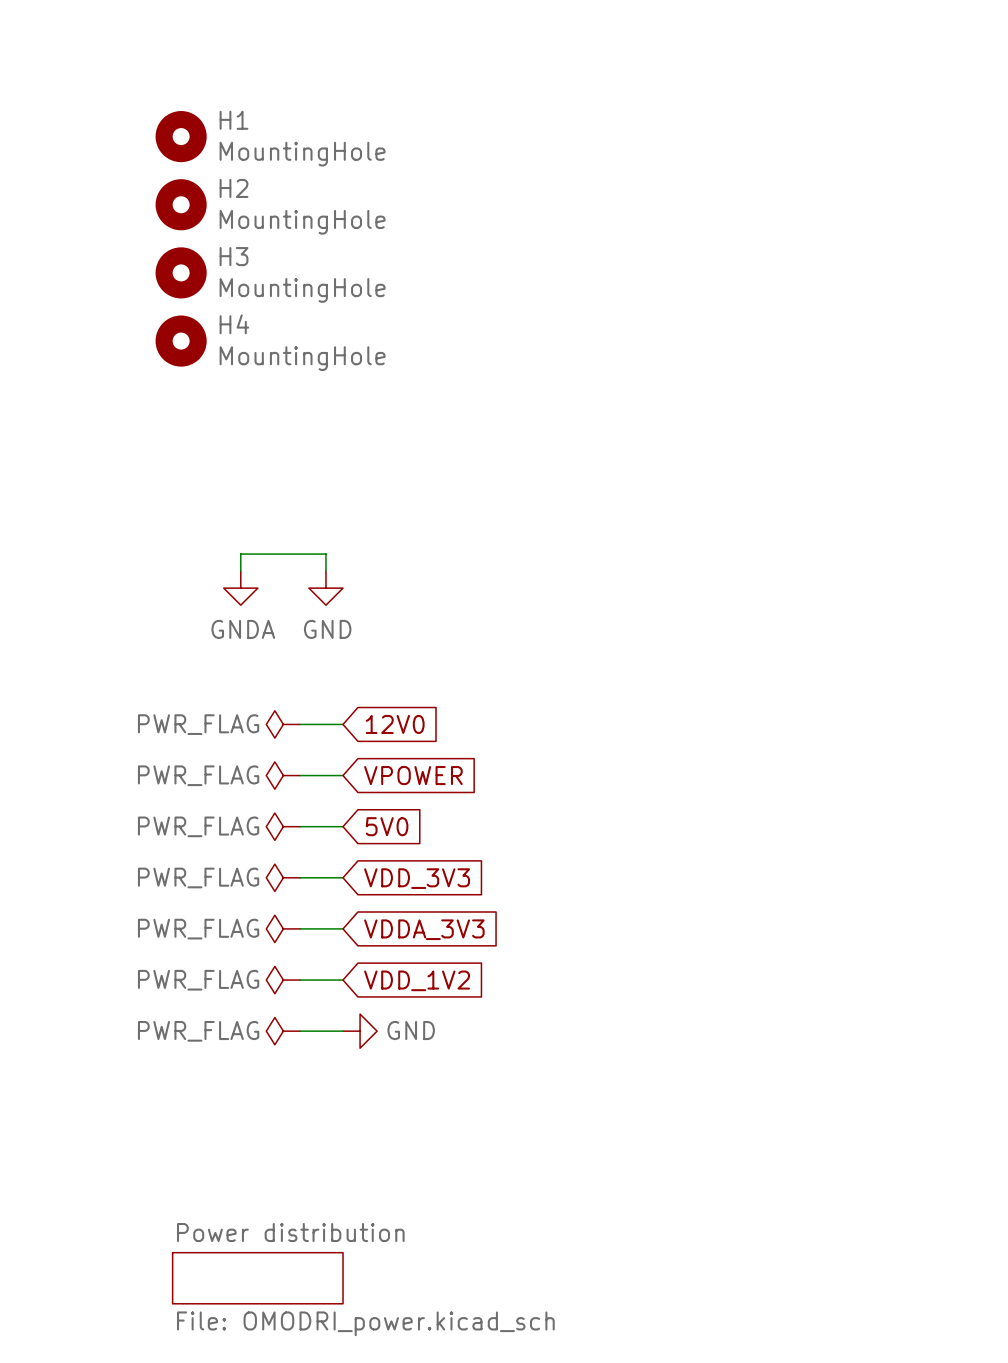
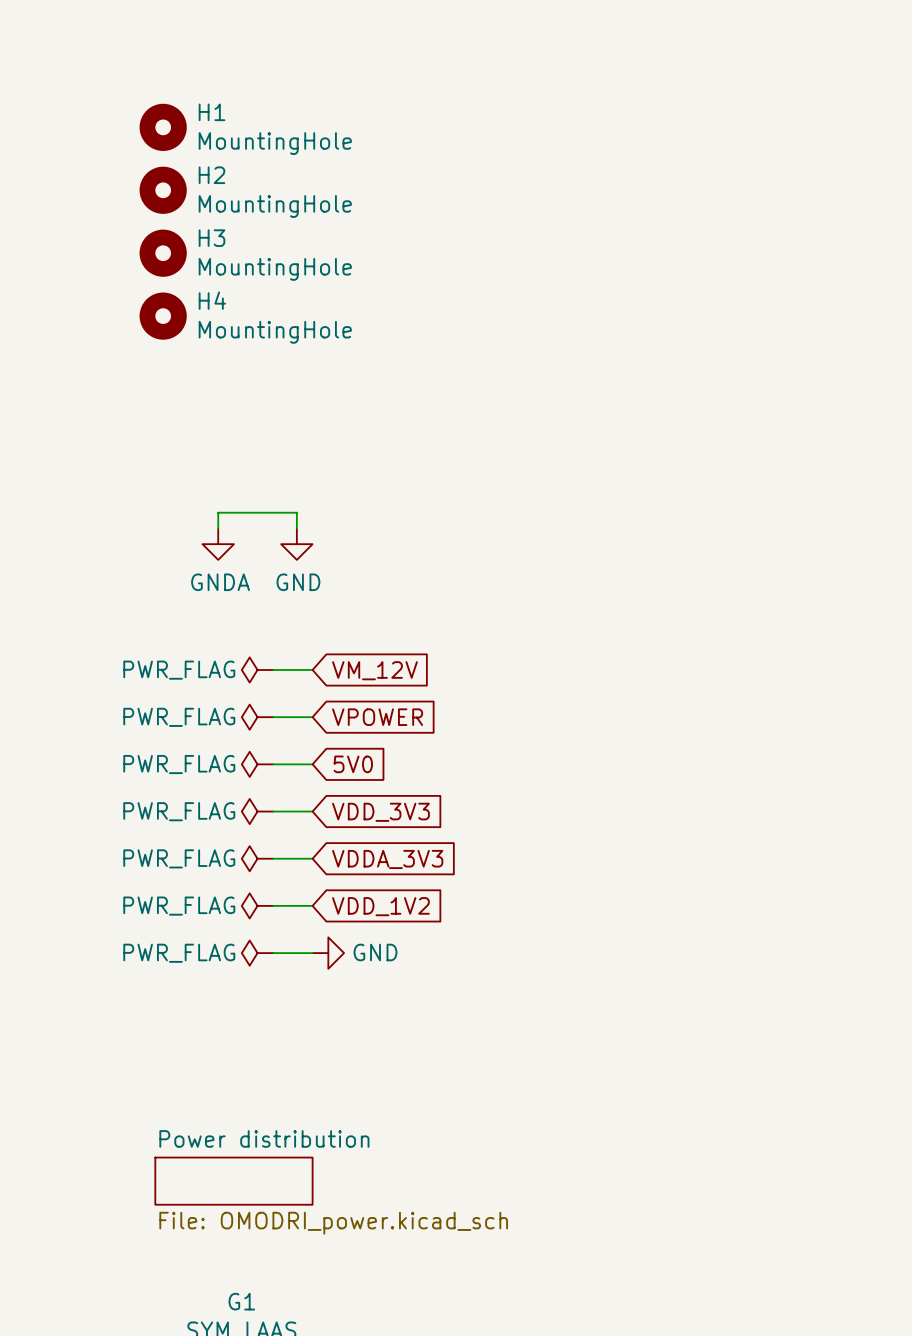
global label: 12V0 (395, 724) -> VM_12V (374, 670)

